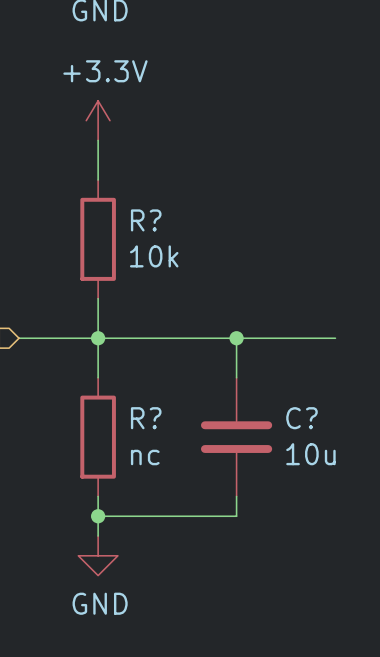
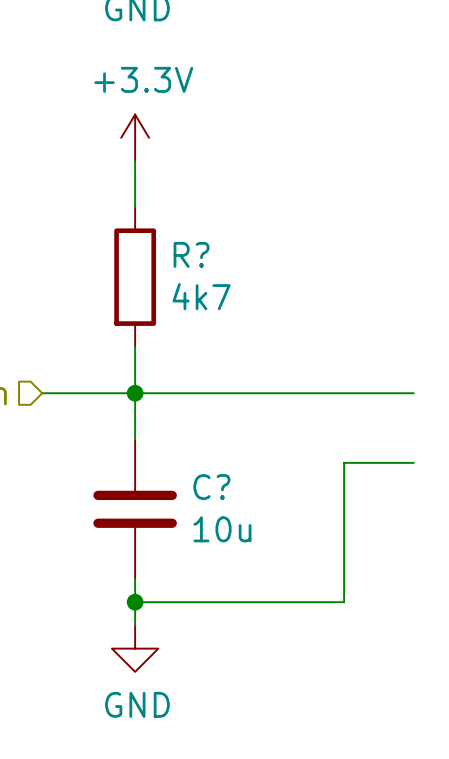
R? value: 10k (154, 256) -> 4k7 (201, 296)
wire: (236, 338) (236, 377) -> none
junction: (236, 338) -> none
R?: nc (98, 437) -> none
C? position: (236, 437) -> (135, 509)
wire: (236, 496) (236, 516) -> (413, 462) (344, 462) (344, 602) (297, 602)

